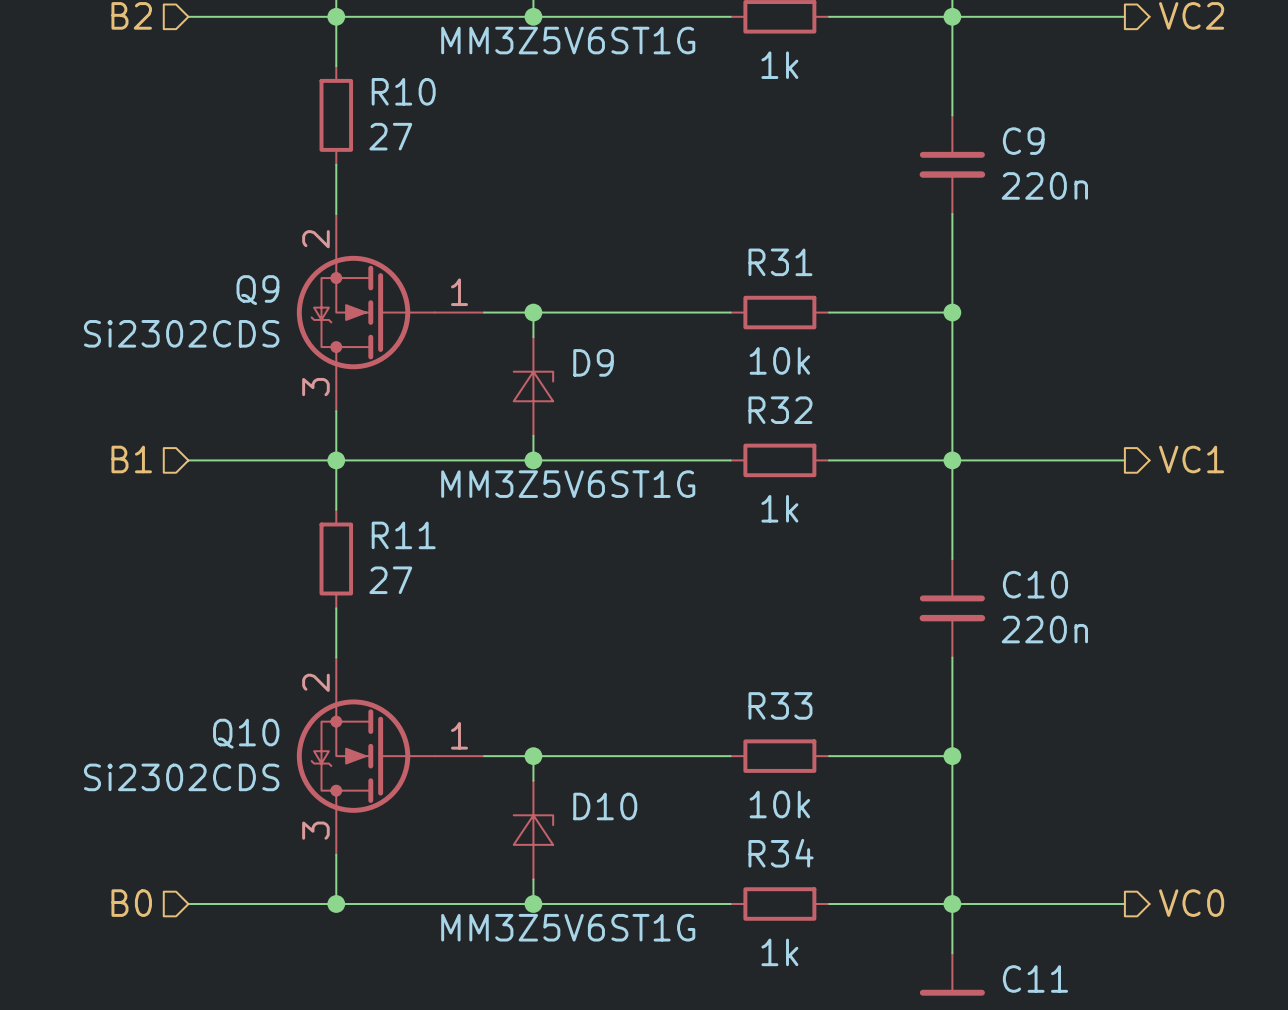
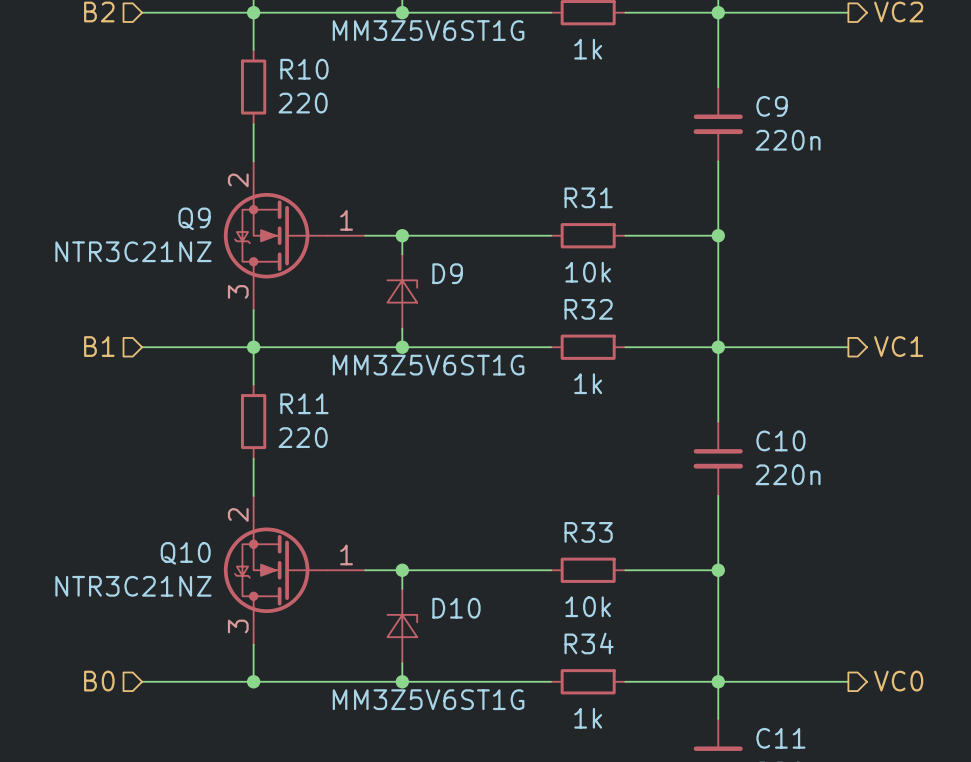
R10 value: 27 (390, 136) -> 220 (303, 103)
Q9 value: Si2302CDS (181, 333) -> NTR3C21NZ (133, 251)
R11 value: 27 (390, 580) -> 220 (303, 437)
Q10 value: Si2302CDS (181, 777) -> NTR3C21NZ (133, 586)

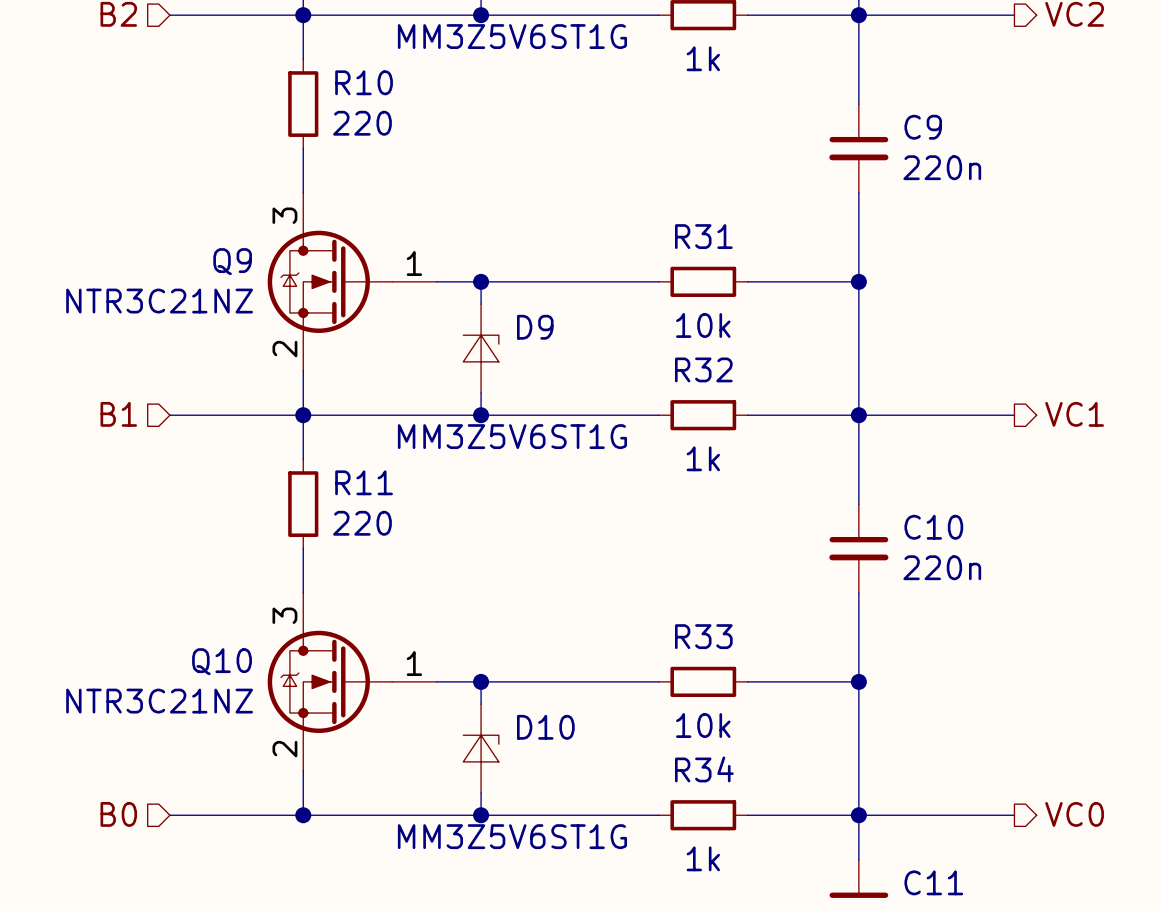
Q9 flip: as is (275, 235) -> up-down (329, 281)
Q10 flip: as is (275, 570) -> up-down (329, 681)

